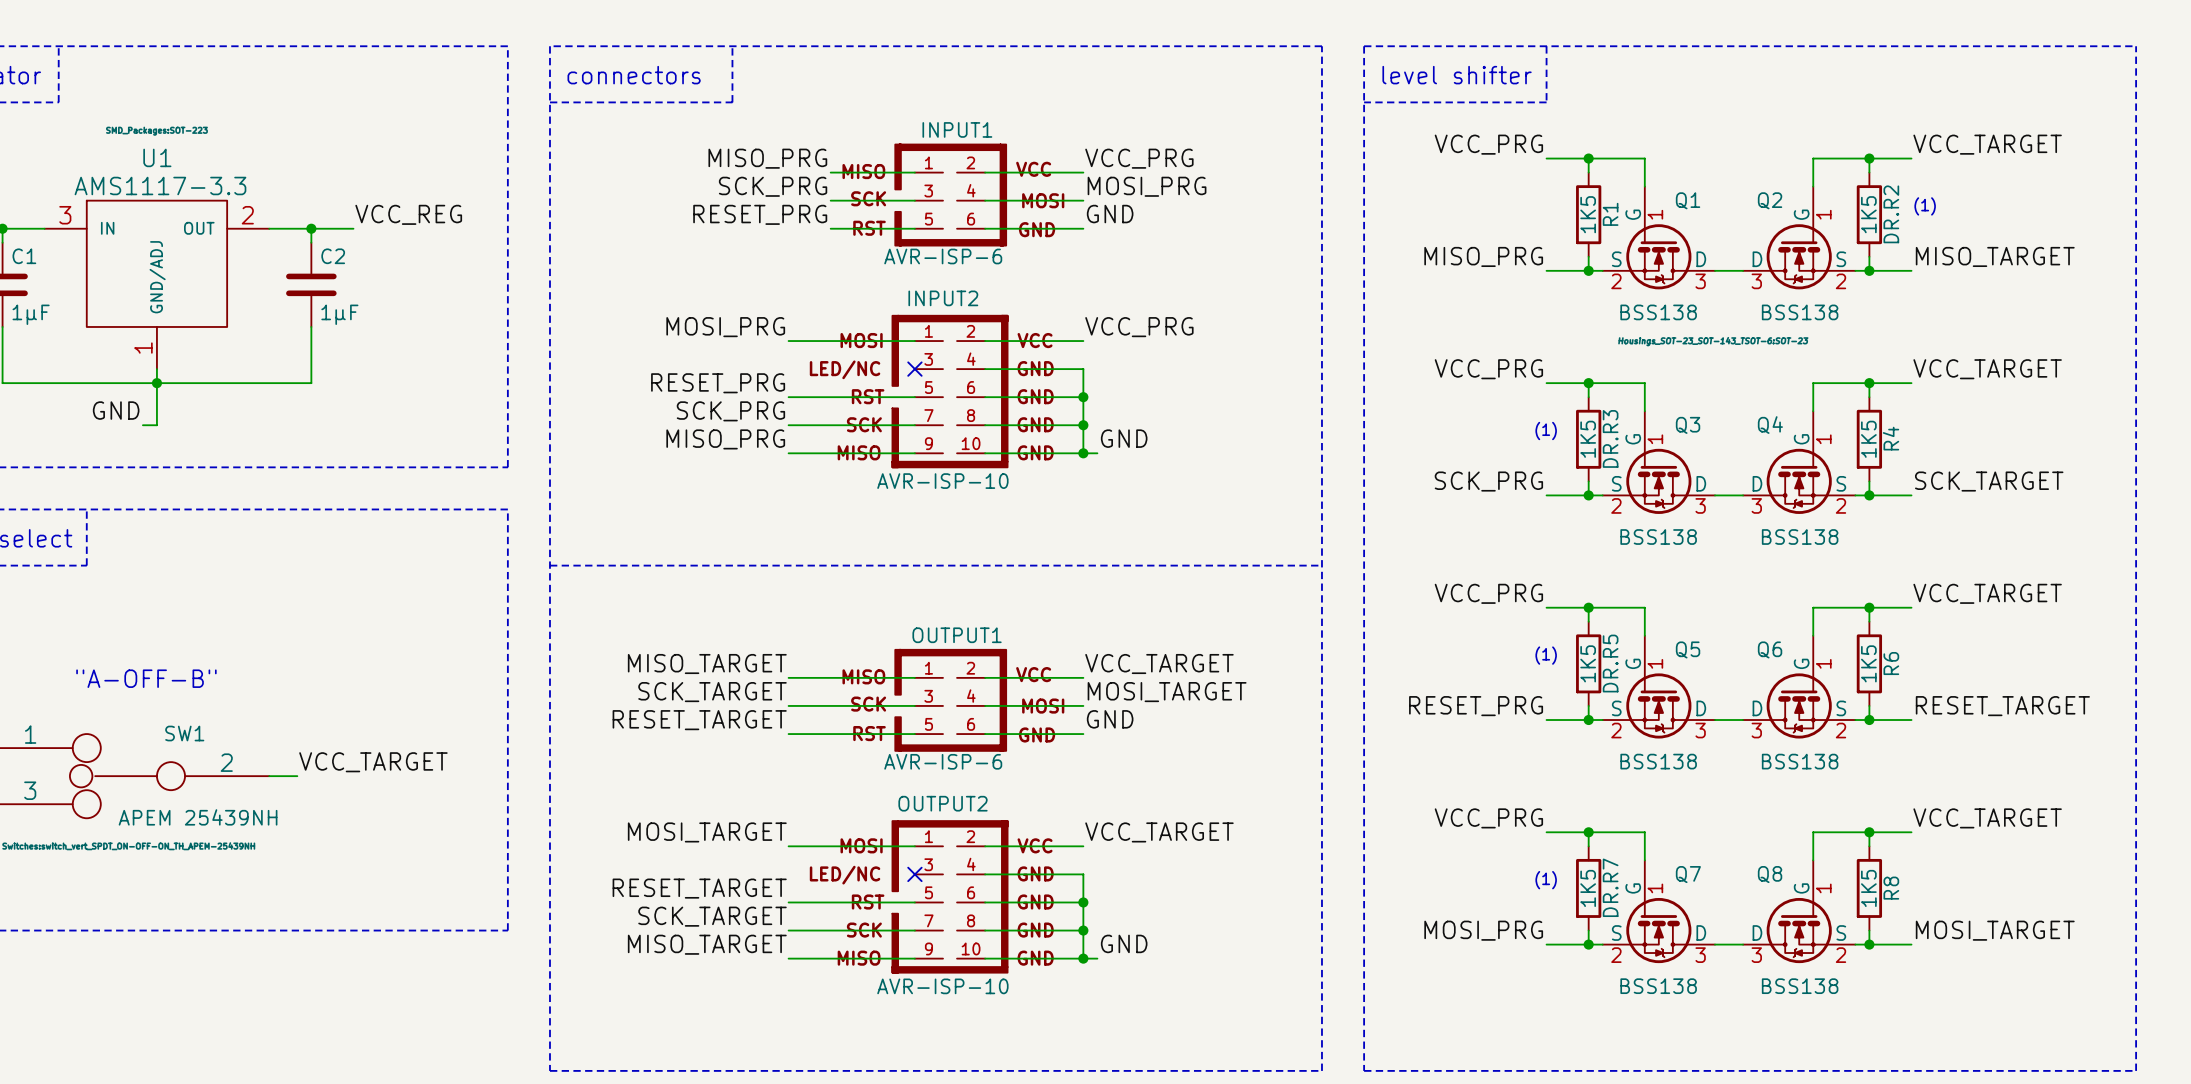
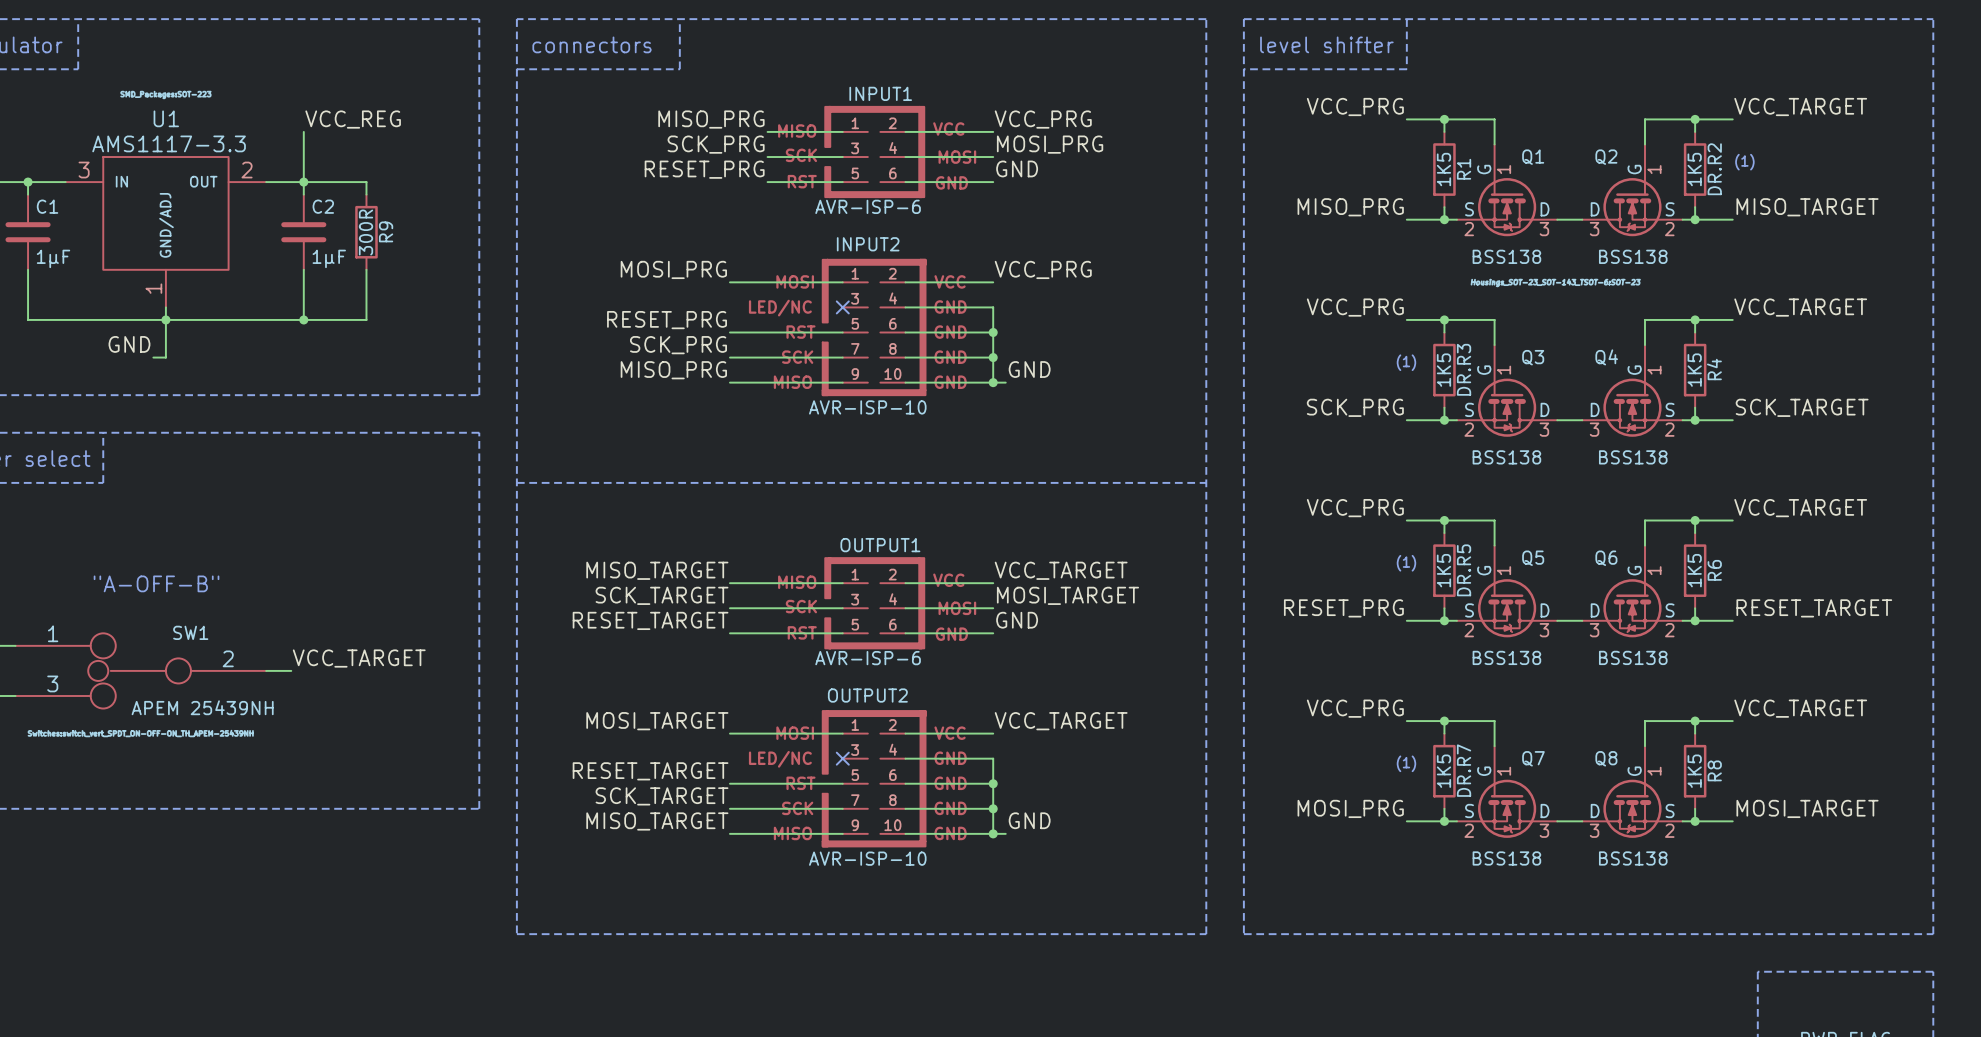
wire: none -> (303, 131) (303, 182)
label position: VCC_REG (408, 214) -> VCC_REG (353, 119)
wire: none -> (341, 182) (366, 182) (366, 194)
R9: none -> 300R (366, 232)
wire: none -> (366, 269) (366, 319) (303, 319)
junction: none -> (303, 319)

